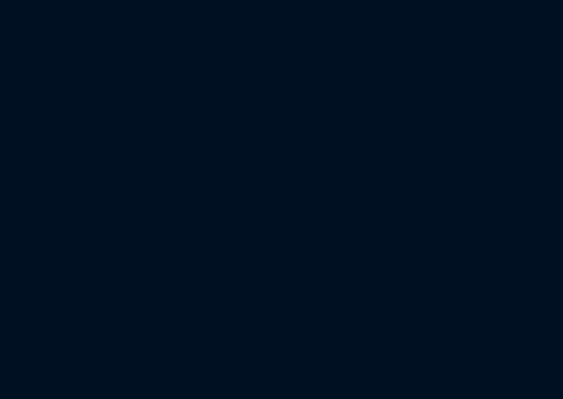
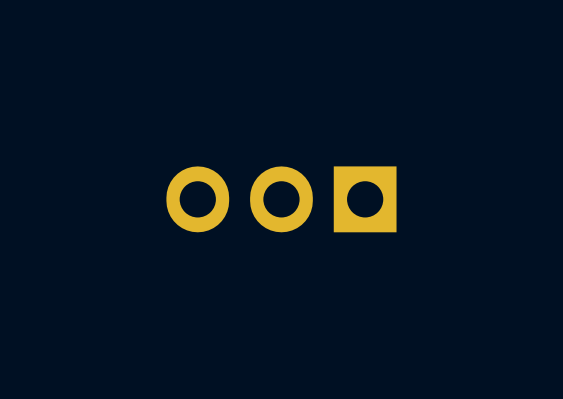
part: none -> (281, 199)

